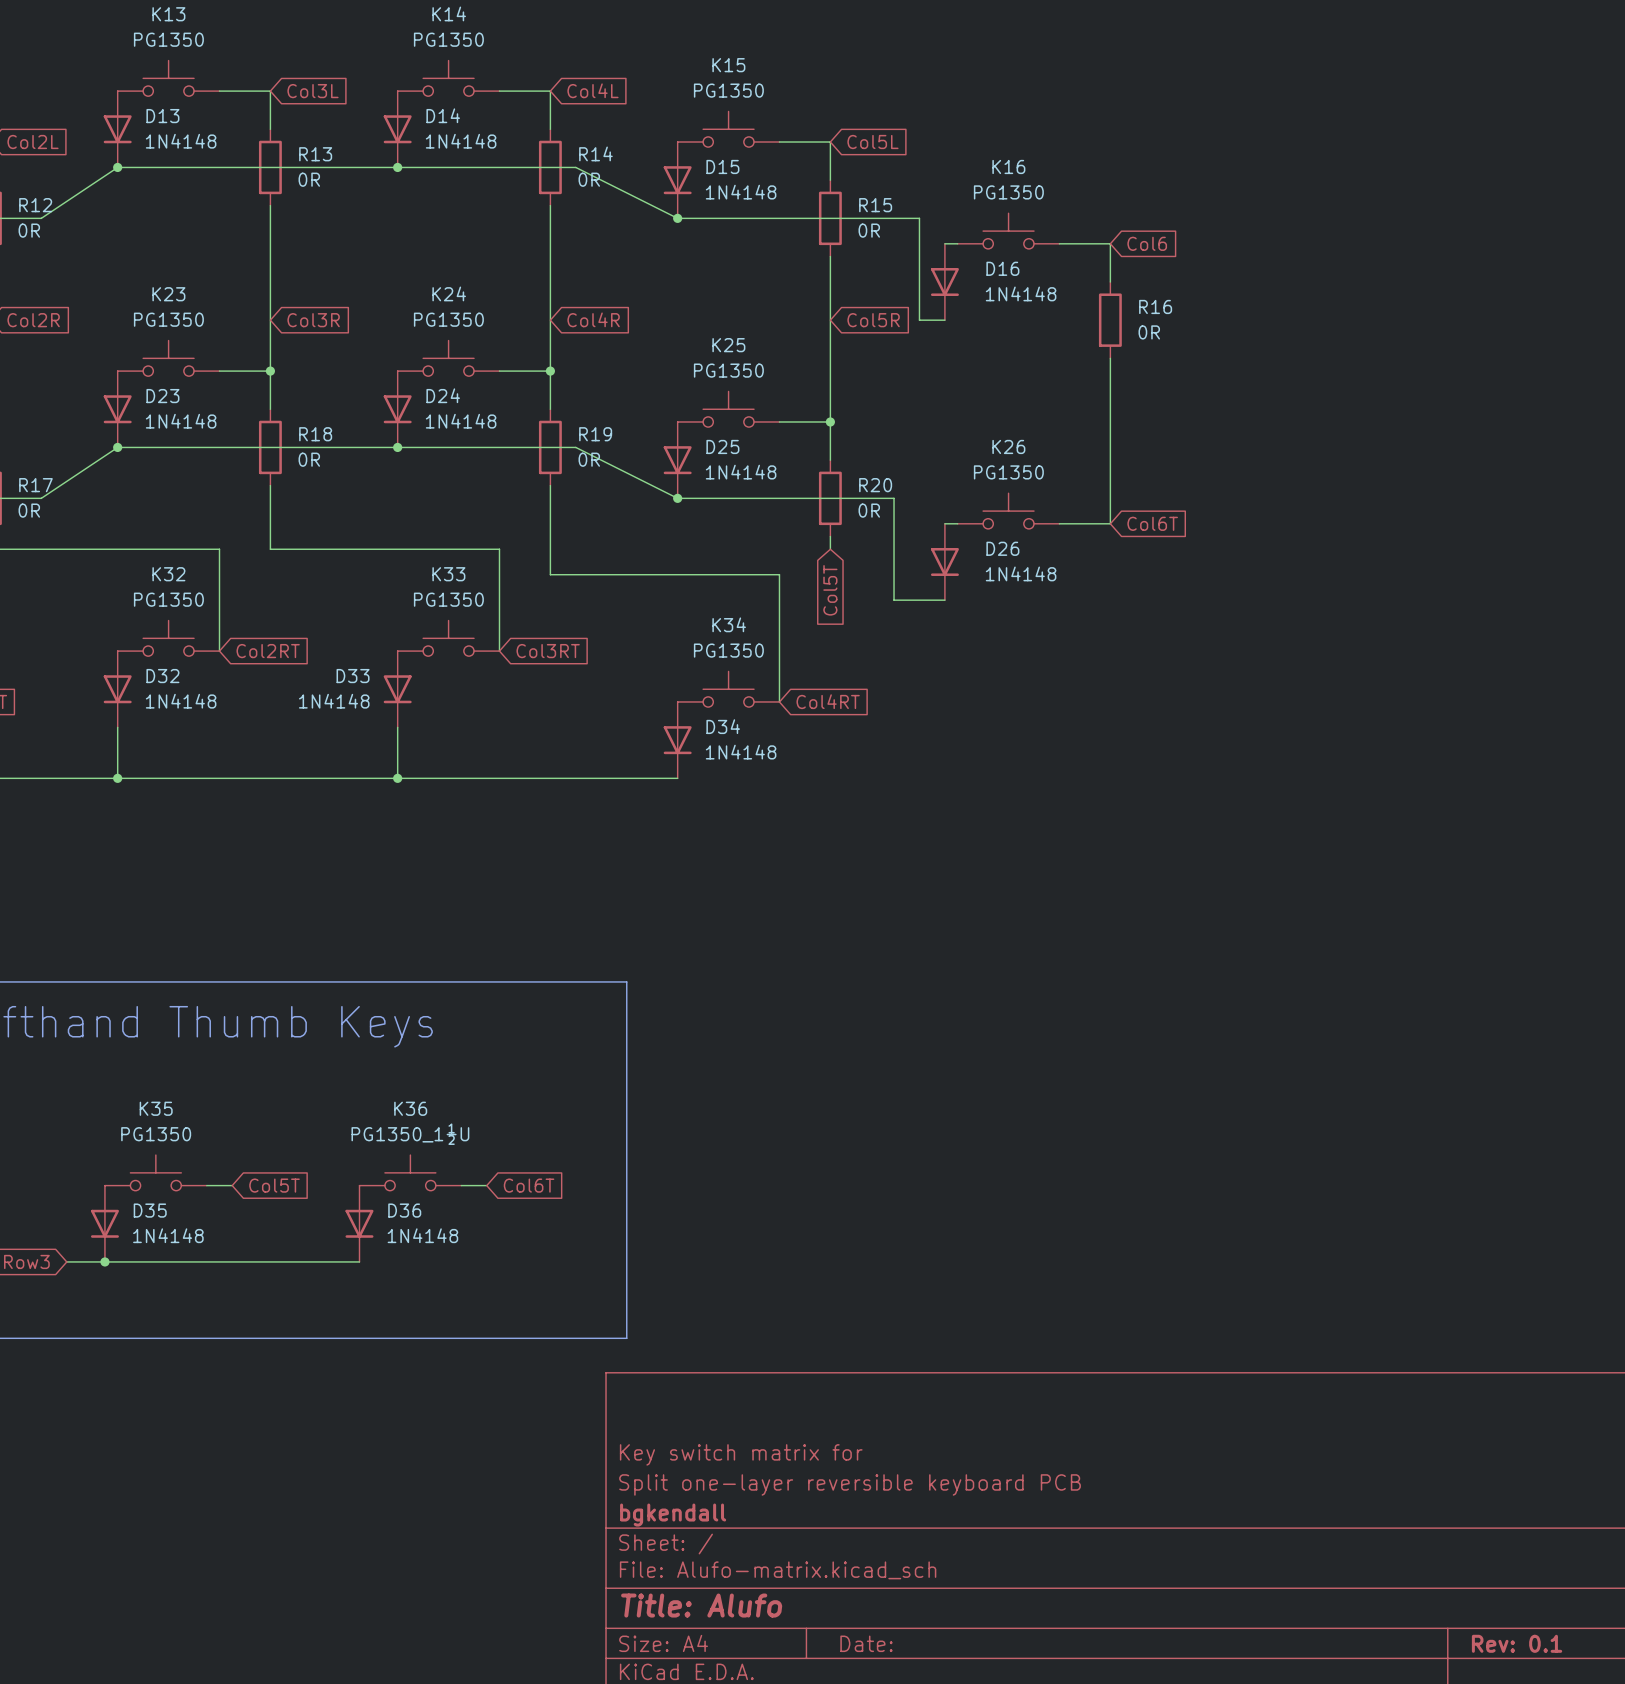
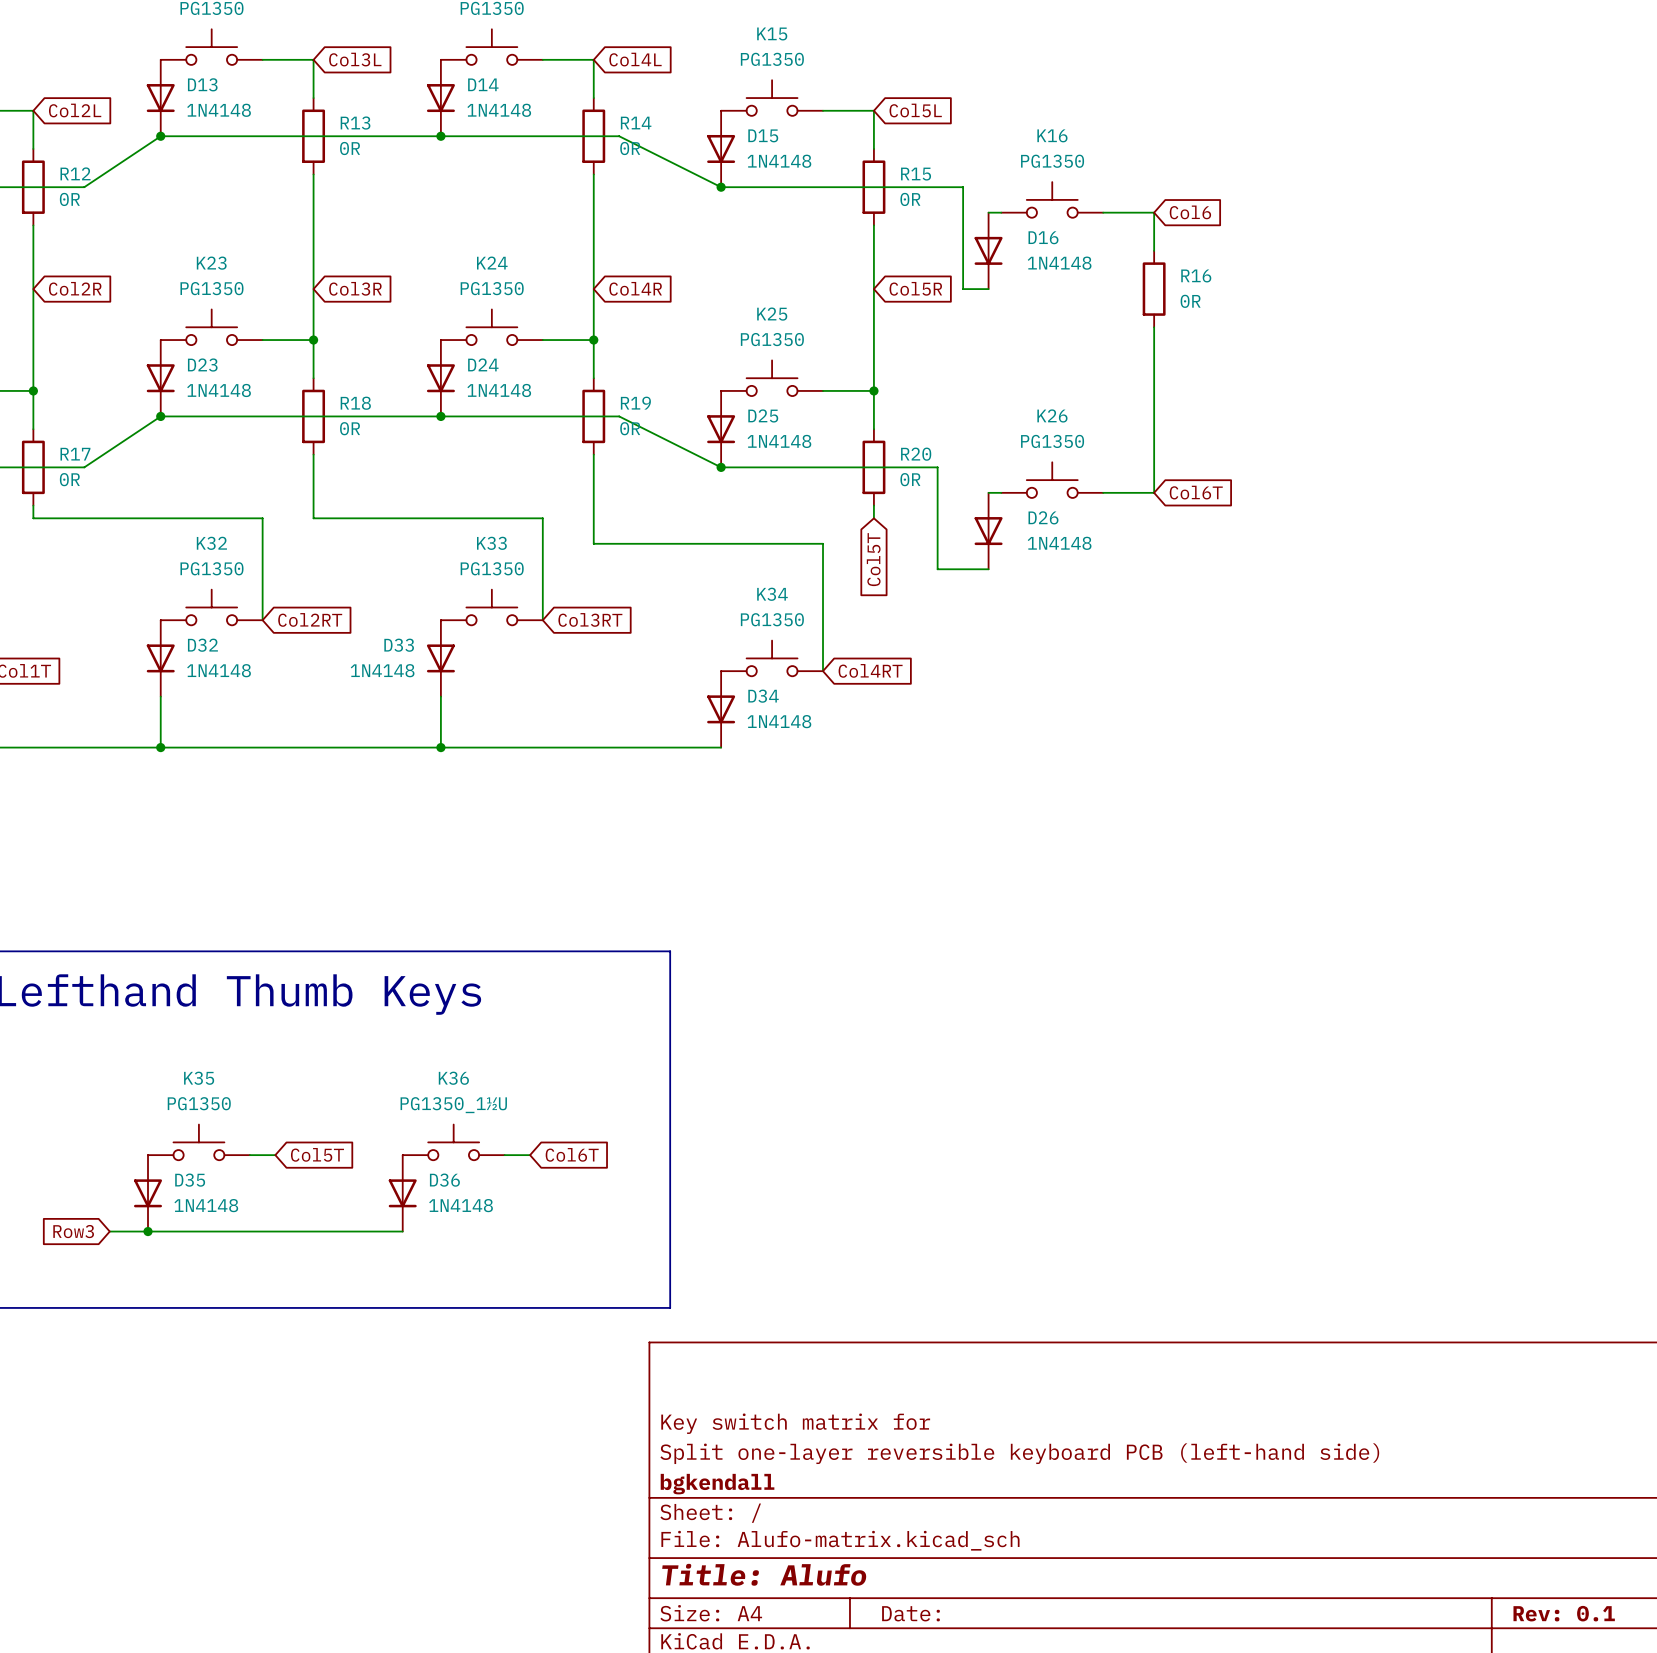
title block: Split one-layer reversible keyboard PCB (850, 1484) -> Split one-layer reversible keyboard PCB (left-hand side) (1019, 1453)

